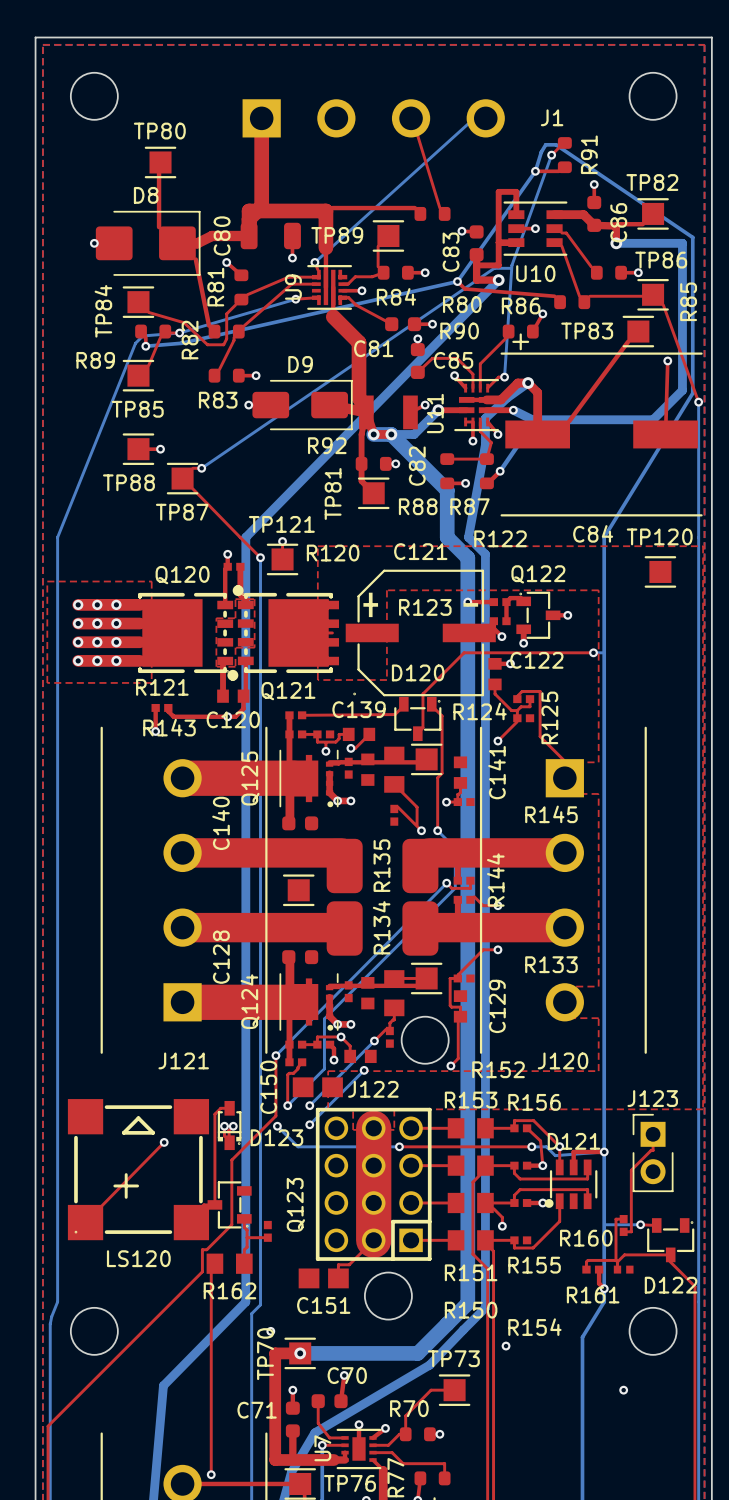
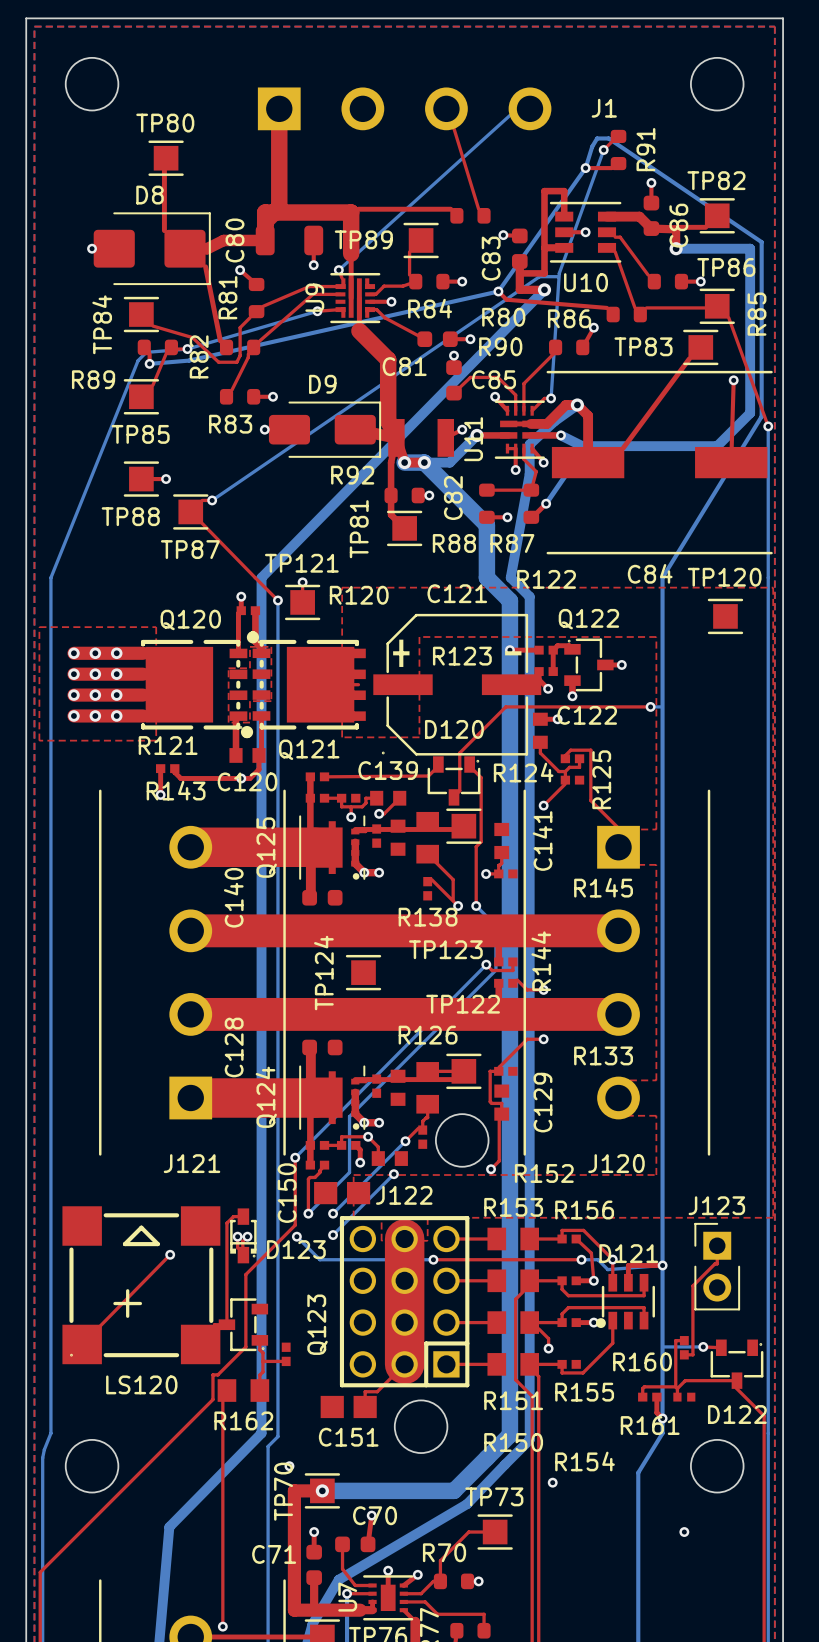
C84 footprint: [500, 333, 703, 517] -> [546, 370, 773, 555]
R138 name: none -> R138 (428, 917)
top track: none -> (369, 930) (466, 930)
R135: (382, 866) -> none
TP123 name: none -> TP123 (445, 949)
part: (298, 890) -> none
TP124: none -> (363, 972)
TP122 name: none -> TP122 (463, 1004)
top track: none -> (369, 1014) (466, 1014)
R134: (382, 928) -> none
R126 name: none -> R126 (428, 1035)

